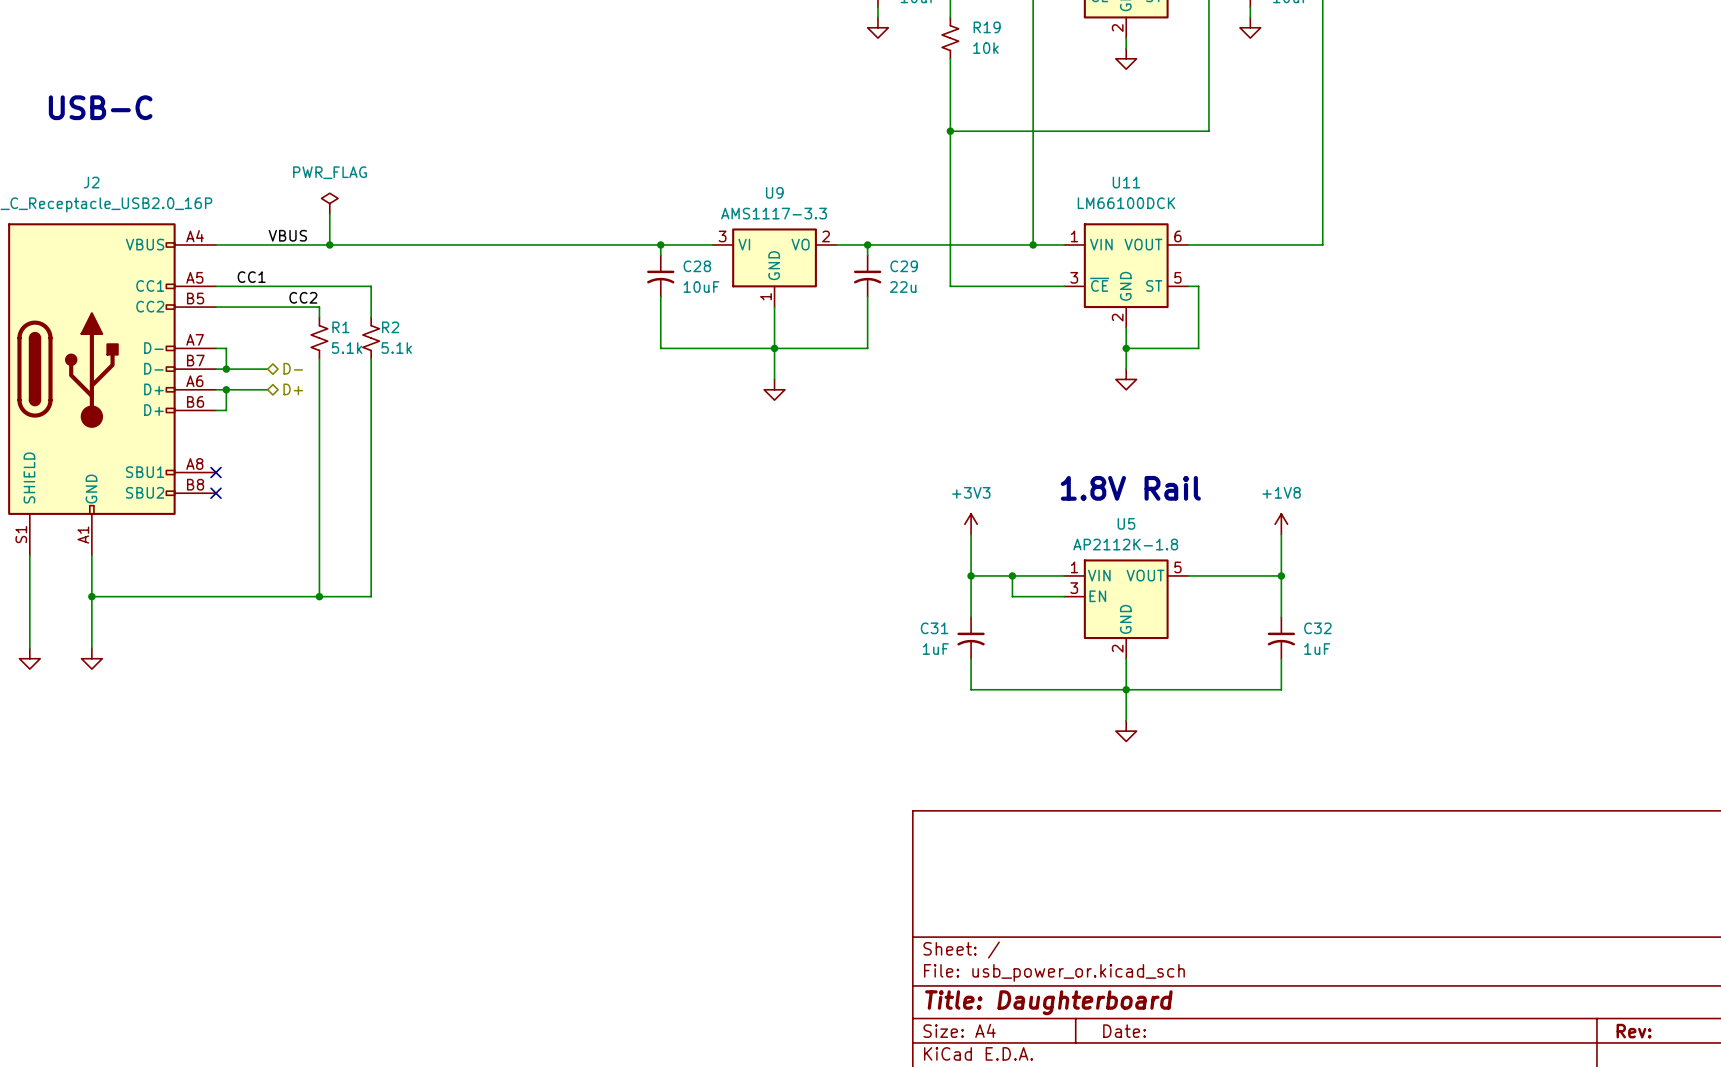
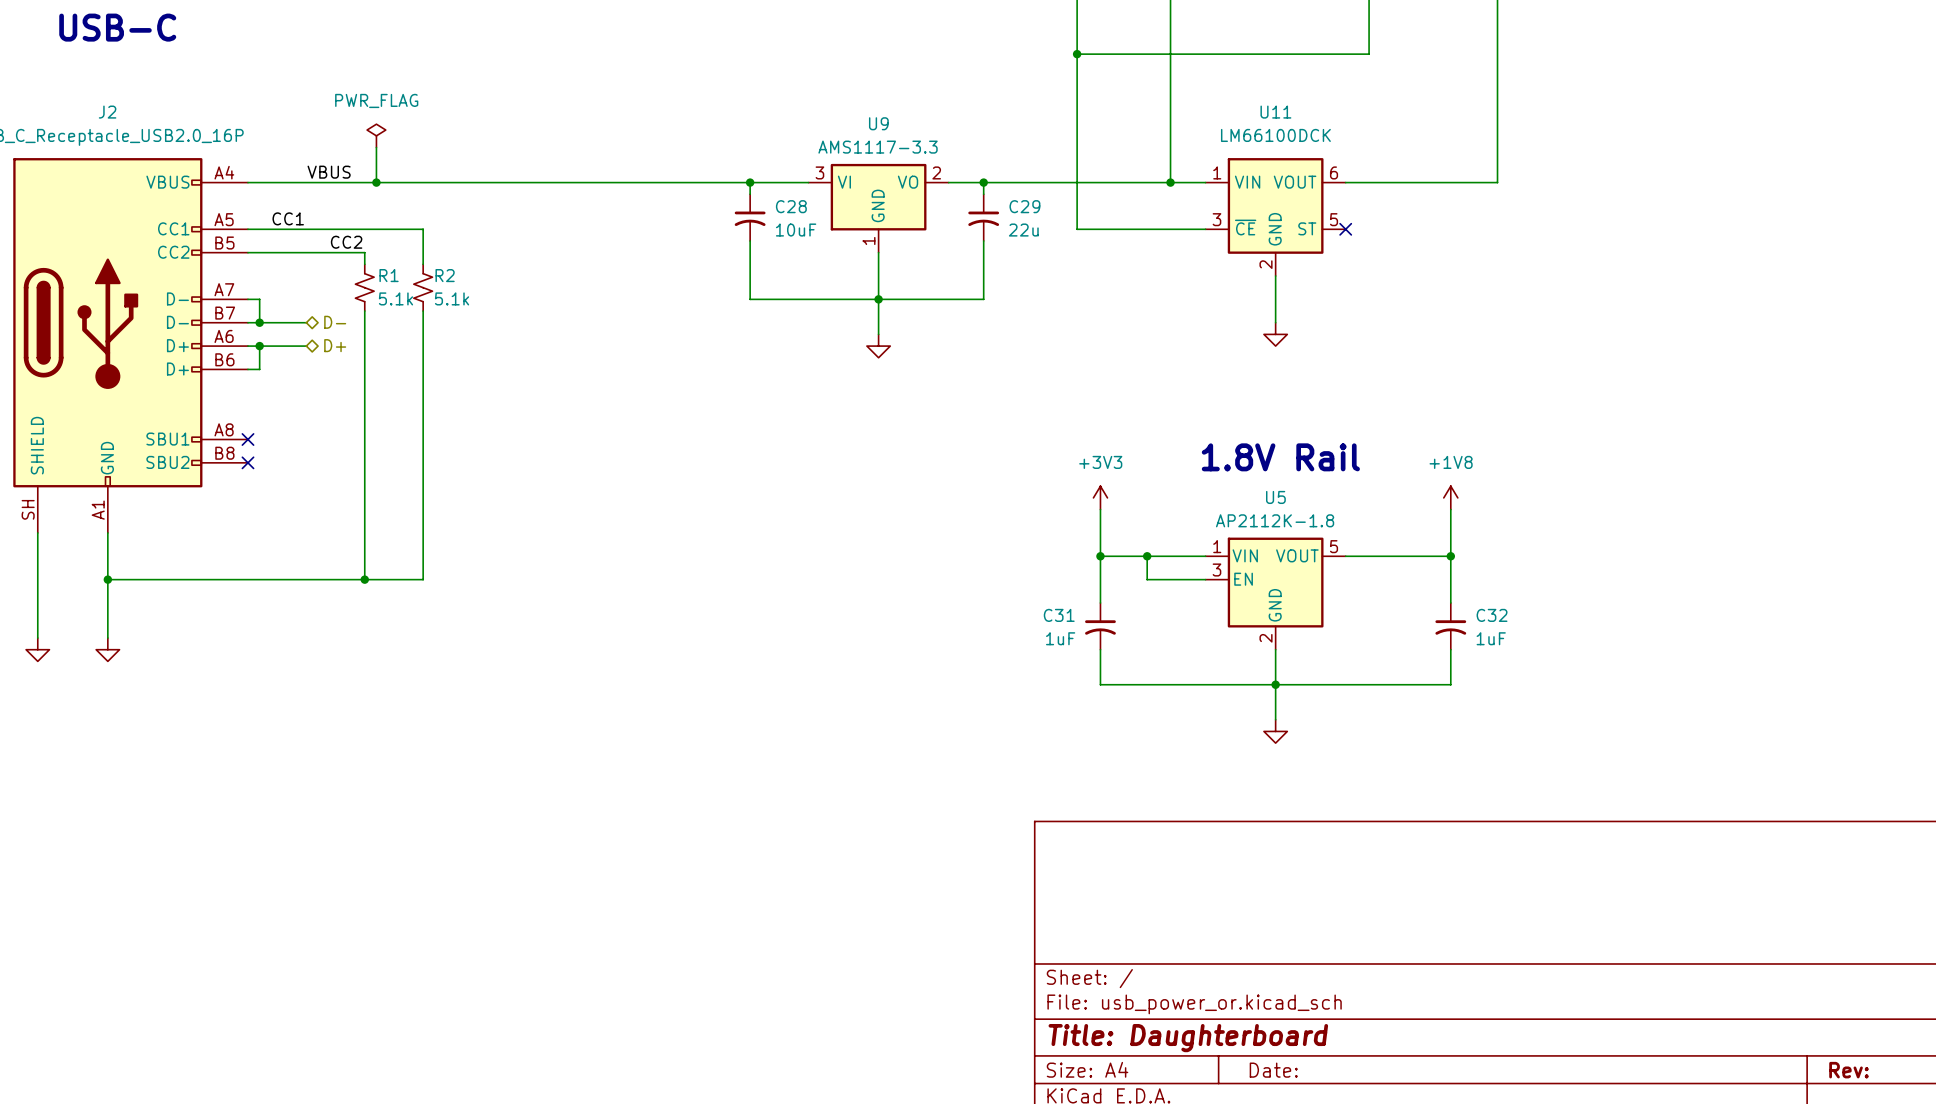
wire: (1188, 286) (1198, 286) (1198, 348) (1126, 348) -> none
no-connect mark: none -> (1345, 229)
junction: (1126, 348) -> none
J2 pin number: S1 (21, 534) -> SH (28, 509)

